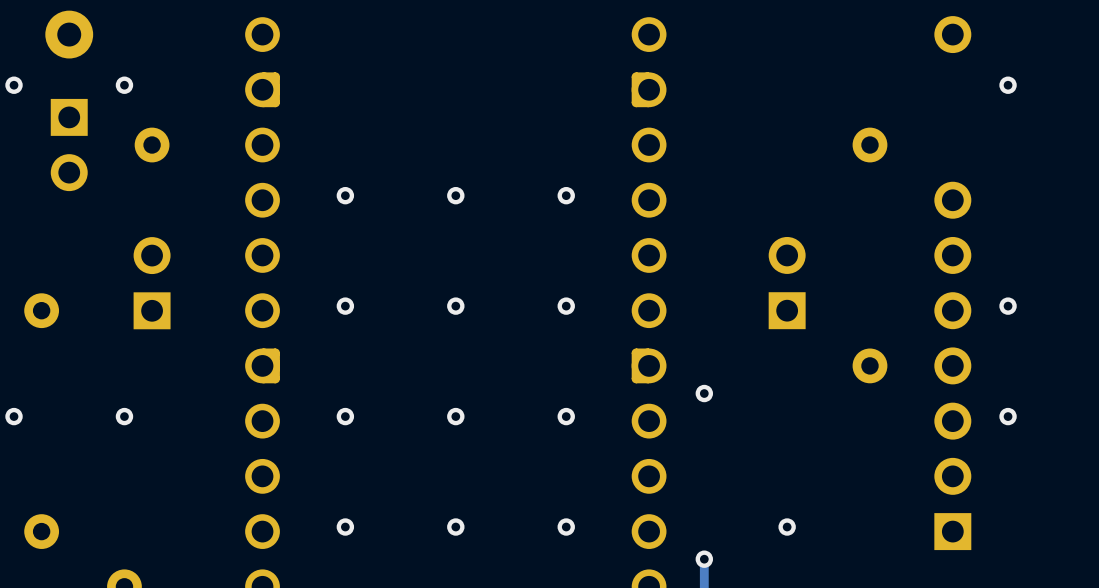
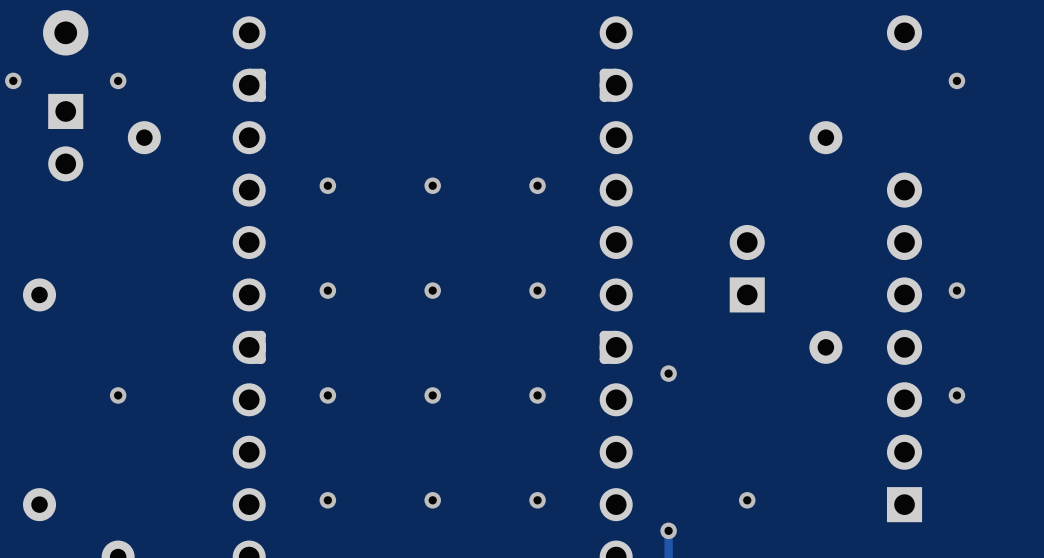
part: (152, 283) -> none
via: (14, 416) -> none

